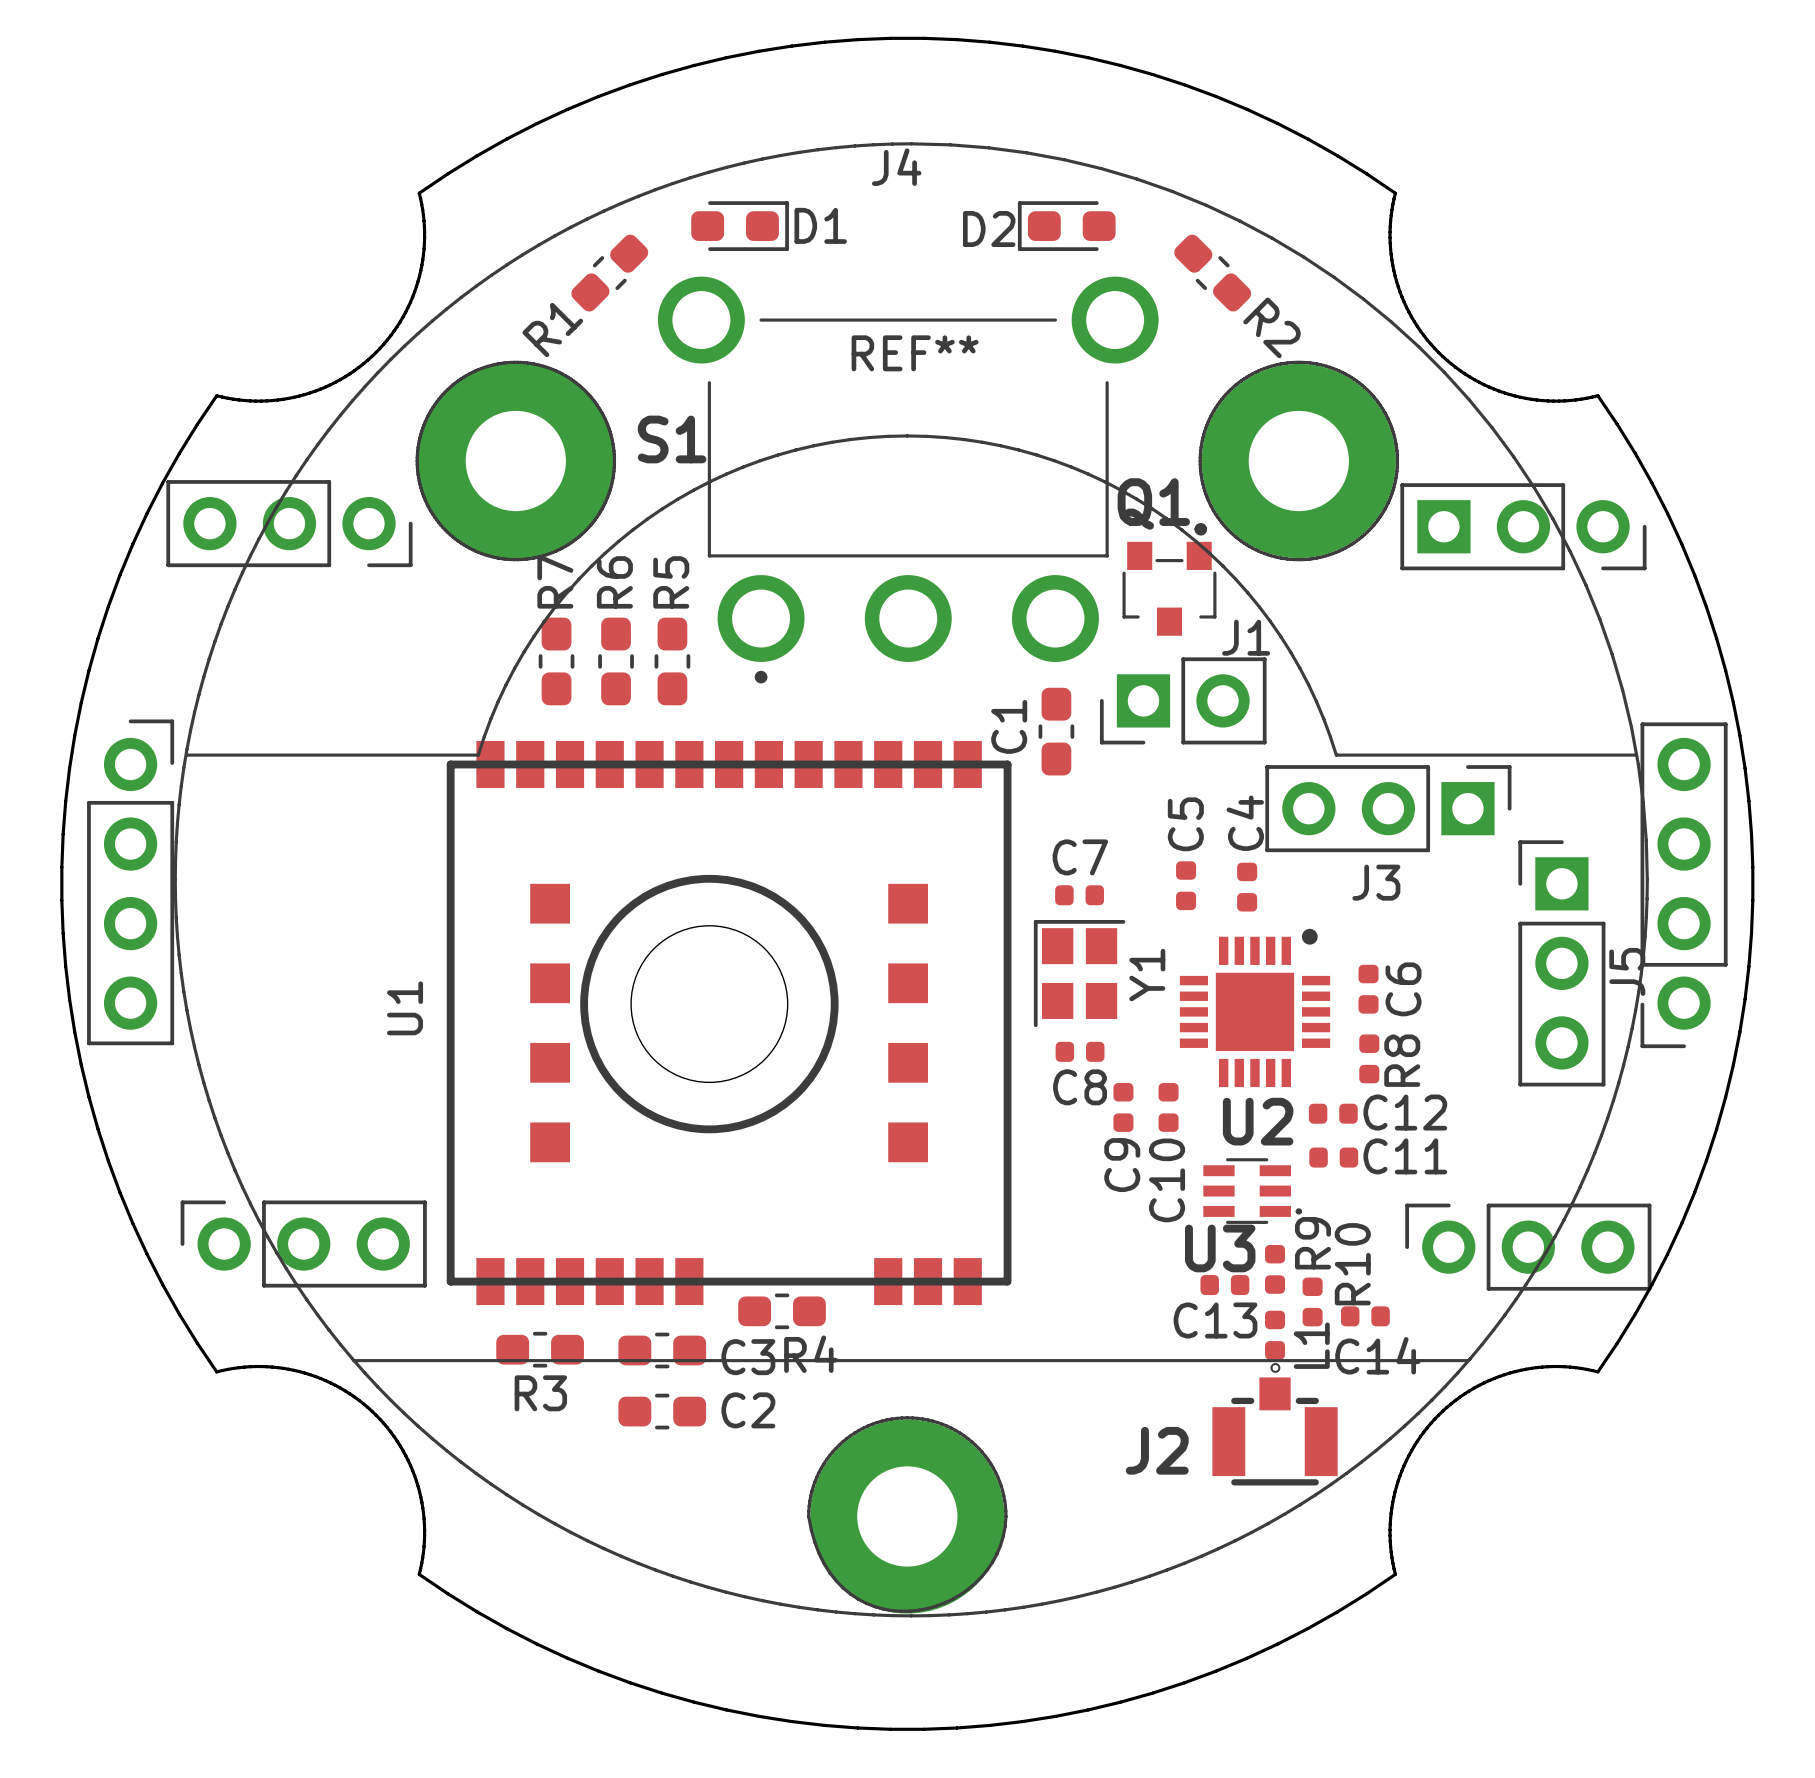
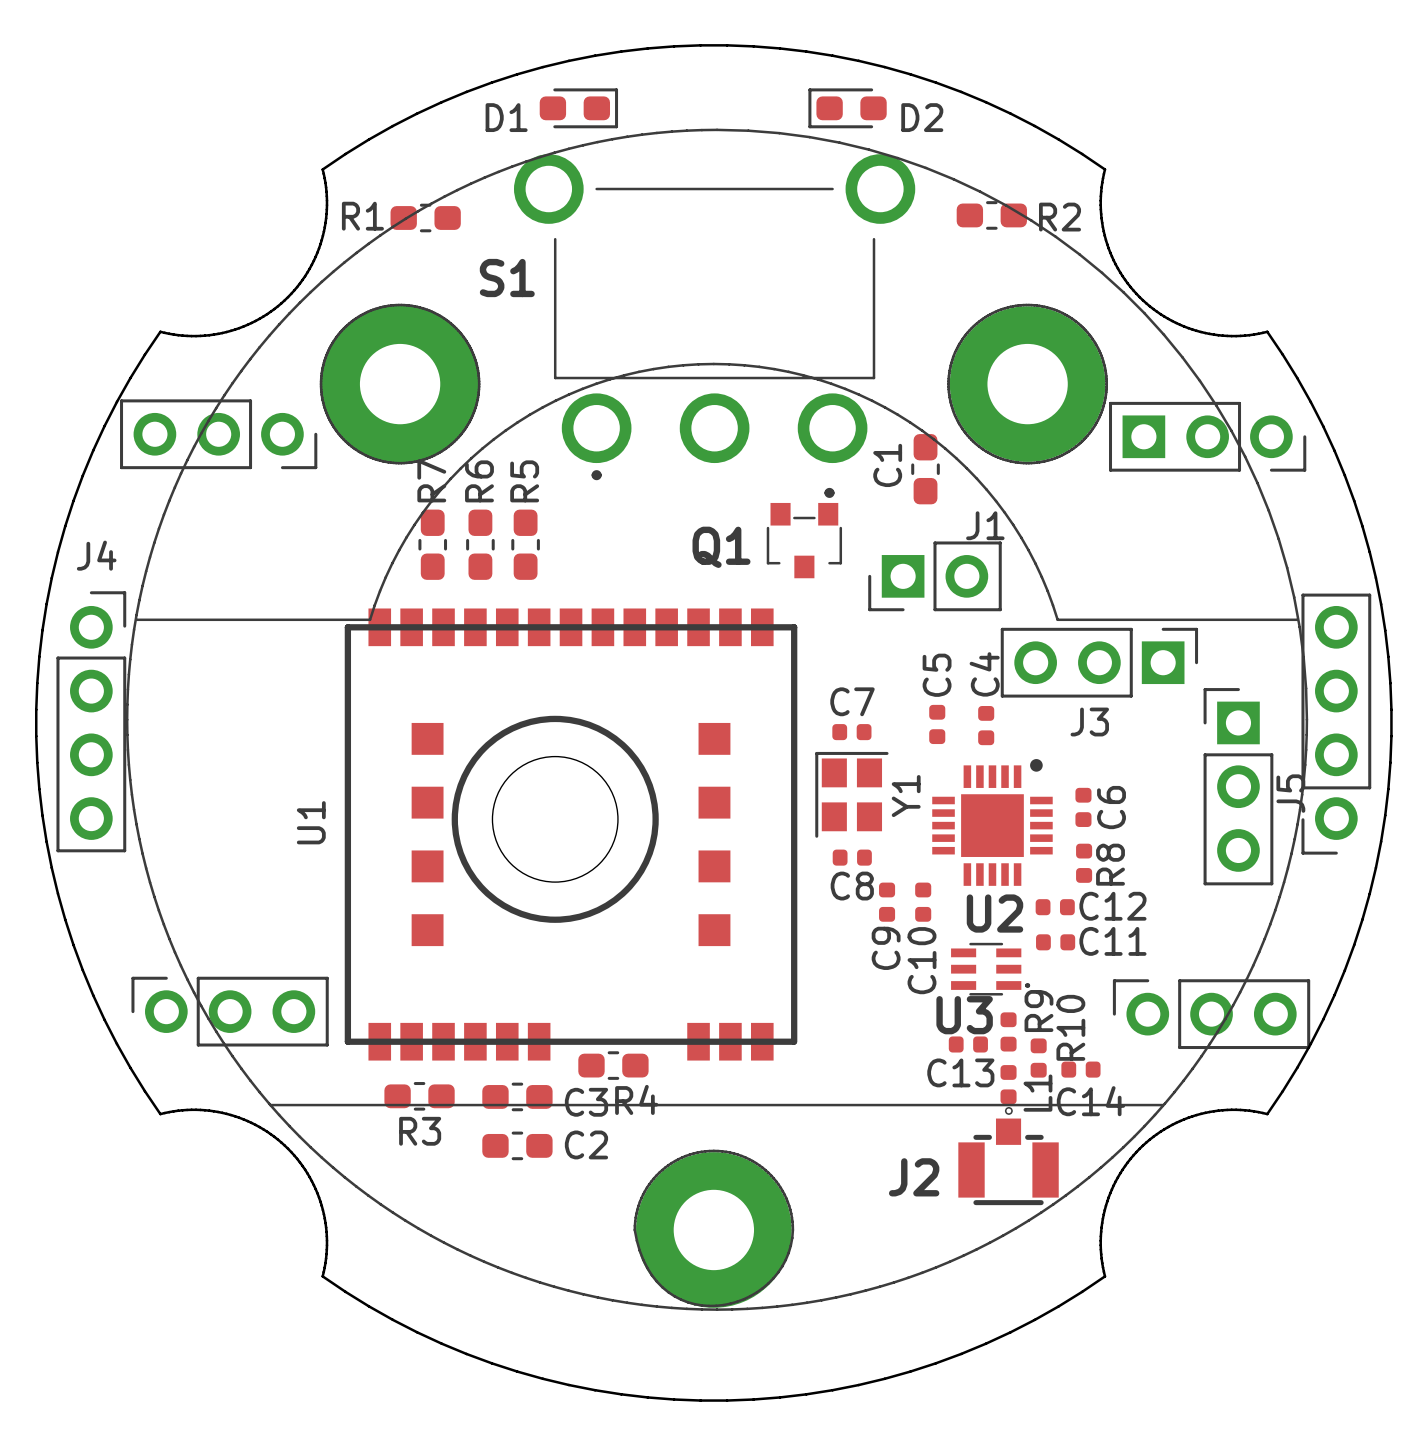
J4 name position: J4 (896, 167) -> J4 (96, 555)
D1 name position: D1 (820, 225) -> D1 (506, 117)
D1 position: (740, 226) -> (578, 108)
D2 position: (1066, 226) -> (847, 108)
D2 name position: D2 (989, 229) -> D2 (922, 117)
R1 rotation: 0° (609, 273) -> 45° clockwise (425, 218)
R1 position: (609, 273) -> (425, 218)
R2 rotation: 0° (1212, 273) -> 45° counterclockwise (991, 215)
R2 position: (1212, 273) -> (991, 215)
S1 name position: S1 (672, 439) -> S1 (507, 278)
S1 position: (908, 479) -> (714, 317)
Q1 name position: Q1 (1153, 504) -> Q1 (721, 547)
Q1 position: (1169, 579) -> (804, 533)
C1 position: (1056, 731) -> (925, 469)
REF**: (907, 883) -> none

